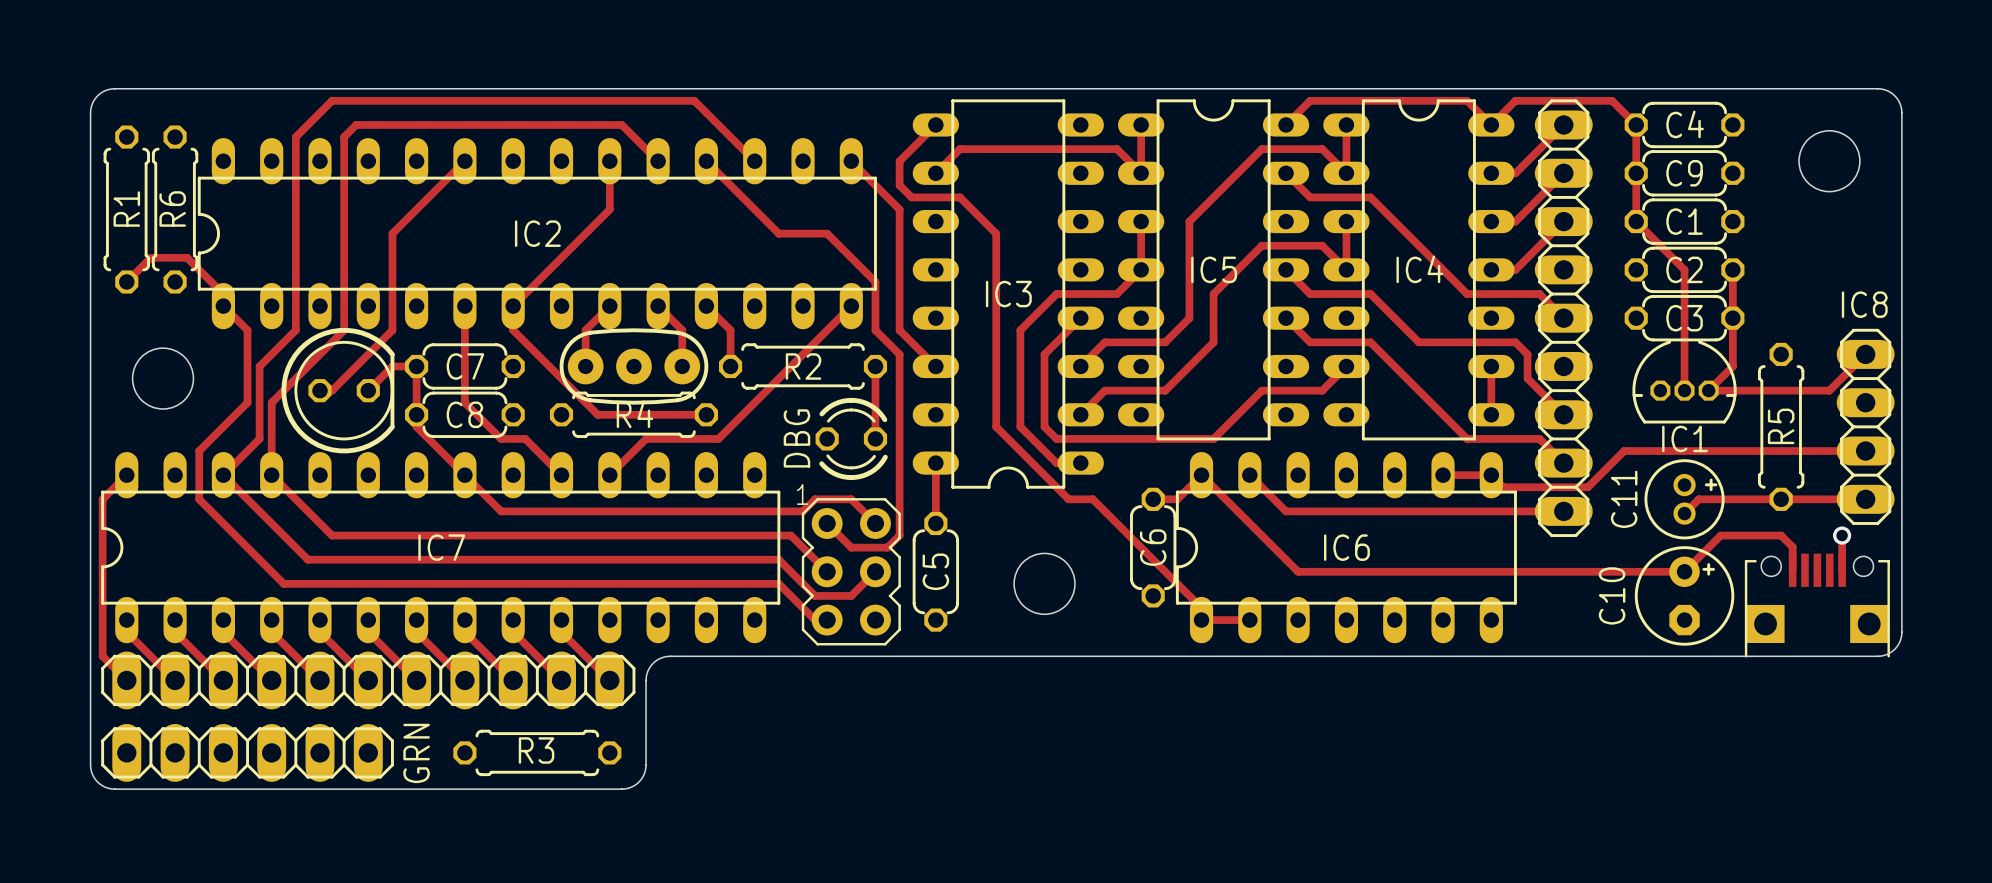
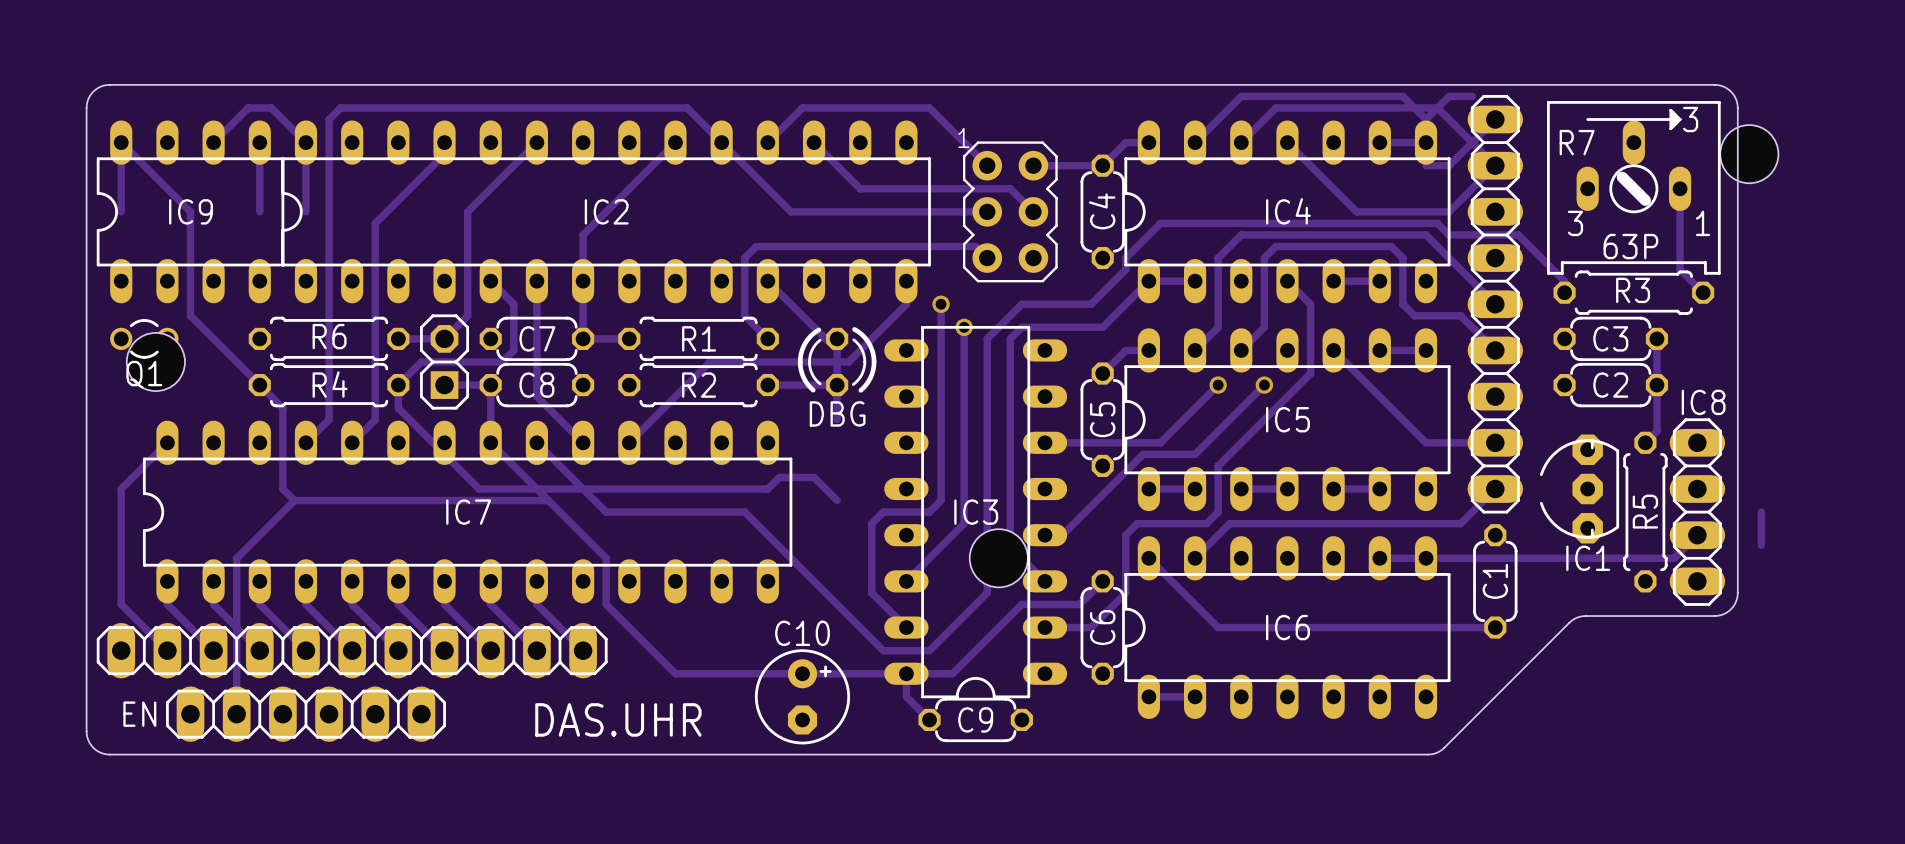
board edge: (1793, 88) (1880, 88) (1894, 95) (1901, 109) (1901, 632) (1898, 644) (1889, 653) (1877, 656) (667, 656) (653, 663) (646, 677) (646, 764) (644, 774) (633, 785) (621, 789) -> (1714, 84) (1723, 86) (1731, 91) (1736, 99) (1737, 107) (1737, 592) (1734, 604) (1726, 612) (1714, 616) (1585, 616) (1576, 617) (1569, 622) (1444, 747) (1431, 754) (594, 754)
track: (1310, 100) (1286, 124) -> (1252, 96) (1241, 96) (1195, 142)
track: (1539, 100) (1612, 100) (1636, 124) (1636, 221) (1684, 269) (1684, 390) -> none
track: (935, 124) (899, 161) (899, 185) (911, 197) -> (814, 142) (860, 188) (871, 188)
track: (1141, 124) (1141, 173) (1116, 149) (960, 149) (935, 173) -> none
track: (1346, 124) (1346, 173) (1322, 149) (1261, 149) (1189, 221) (1189, 318) (1165, 342) (1153, 342) -> (1195, 281) (1148, 281) (1102, 327)
C4 rotation: 0° (1684, 124) -> 90° clockwise (1102, 211)
C4 position: (1684, 124) -> (1102, 211)
track: (344, 137) (356, 124) (621, 124) (658, 161) -> (329, 131) (329, 119) (340, 107) (687, 107) (790, 211) (987, 211)
track: none -> (213, 142) (248, 107) (271, 107) (305, 142) (305, 211)
track: none -> (259, 142) (259, 211)
track: none -> (536, 142) (467, 211) (467, 315) (444, 338) (398, 338)
track: none -> (675, 142) (583, 234) (583, 338) (629, 338)
track: none -> (767, 142) (802, 107) (929, 107) (987, 165)
track: none -> (1148, 142) (1125, 142) (1102, 165) (1033, 165)
track: none -> (1241, 142) (1275, 107) (1437, 107) (1495, 165)
track: none -> (1287, 142) (1356, 211) (1426, 211)
track: none -> (1379, 142) (1426, 142)
track: (609, 161) (609, 209) (513, 306) (513, 330) (597, 414) (706, 414) -> none
track: (706, 161) (778, 233) (827, 233) (875, 281) (875, 330) (899, 354) (899, 535) (887, 547) (851, 547) (827, 523) -> none
track: (754, 161) (694, 100) (332, 100) (295, 137) (295, 330) (259, 366) (259, 438) (223, 475) (307, 559) (778, 559) (815, 595) (851, 595) (875, 571) -> none
track: (851, 161) (899, 209) (899, 330) (935, 366) -> none
track: (1286, 173) (1310, 197) (1370, 197) (1467, 294) (1539, 294) -> (1264, 234) (1426, 234) (1472, 281)
C9 position: (1684, 173) -> (975, 719)
R7: none -> (1633, 187)
track: (960, 197) (996, 233) (996, 426) (1068, 499) (1092, 499) (1201, 608) (1201, 620) (1249, 620) -> (917, 188) (1010, 188) (1033, 211)
track: none -> (1680, 188) (1680, 269) (1703, 292)
R1 rotation: 0° (126, 209) -> 90° clockwise (698, 338)
R1 position: (126, 209) -> (698, 338)
R6 rotation: 0° (175, 209) -> 90° clockwise (329, 338)
R6 position: (175, 209) -> (329, 338)
track: none -> (121, 211) (121, 142) (190, 211) (190, 315) (282, 408) (282, 489) (294, 500)
IC9: none -> (190, 211)
track: (1141, 221) (1141, 269) (1116, 294) (1056, 294) (1020, 330) (1020, 426) (1056, 463) (1080, 463) -> none
track: (1346, 221) (1346, 269) (1322, 245) -> none
track: (1563, 221) (1515, 269) (1491, 269) -> none
C1 rotation: 0° (1684, 221) -> 90° clockwise (1495, 581)
C1 position: (1684, 221) -> (1495, 581)
IC2 position: (537, 233) -> (606, 211)
track: (1298, 245) (1261, 245) (1213, 294) (1213, 342) (1165, 390) (1104, 390) (1080, 414) -> (1241, 234) (1218, 258) (1218, 327) (1195, 350)
track: none -> (987, 258) (975, 246) (756, 246) (744, 258) (744, 315) (767, 338)
IC5 rotation: 0° (1213, 269) -> 90° counterclockwise (1287, 419)
IC5 position: (1213, 269) -> (1287, 419)
track: (1286, 269) (1310, 294) (1370, 294) (1418, 342) (1515, 342) (1527, 354) (1527, 378) (1563, 414) -> none
IC4 rotation: 0° (1418, 269) -> 90° counterclockwise (1287, 211)
C2 position: (1684, 269) -> (1610, 385)
track: (1732, 269) (1732, 354) -> none
track: (126, 281) (150, 257) (187, 257) (223, 294) (223, 306) (247, 330) (247, 402) (199, 451) (199, 499) (283, 583) (778, 583) (815, 620) (827, 620) -> none
track: none -> (536, 281) (536, 396) (583, 442)
track: none -> (767, 281) (825, 338) (837, 338)
track: none -> (906, 281) (906, 304) (848, 361) (710, 361) (629, 442)
IC3 position: (1008, 294) -> (975, 512)
track: none -> (1287, 281) (1310, 304) (1310, 373) (1218, 465) (1218, 512) (1206, 523) (1137, 523) (1125, 535) (1125, 592) (1091, 627) (1044, 627)
track: none -> (1333, 281) (1379, 281)
IC8 name position: IC8 (1864, 304) -> IC8 (1703, 402)
track: (464, 306) (464, 402) (501, 438) (525, 438) (561, 475) -> none
track: (609, 306) (585, 330) (585, 366) -> none
track: (658, 306) (682, 330) (682, 366) -> none
track: (706, 306) (730, 330) (730, 366) -> none
track: (851, 306) (718, 438) (646, 438) (609, 475) -> none
track: none -> (941, 304) (941, 500) (929, 512) (883, 512) (871, 523) (871, 592) (906, 627)
via: none -> (941, 304)
track: (1080, 318) (1044, 354) (1044, 426) (1056, 438) (1213, 438) (1261, 390) (1322, 390) (1346, 366) -> none
track: (1286, 318) (1310, 342) (1370, 342) (1394, 366) -> none
C3 position: (1684, 318) -> (1610, 338)
track: (344, 330) (271, 402) (271, 475) (332, 535) (633, 535) -> (536, 442) (606, 512)
track: none -> (329, 315) (329, 419) (305, 442)
track: (392, 330) (332, 390) (319, 390) -> (375, 315) (375, 419) (352, 442)
IC1 footprint: [1632, 340, 1737, 424] -> [1539, 434, 1620, 544]
track: none -> (964, 327) (964, 523) (906, 581)
via: none -> (964, 327)
track: (1104, 342) (1080, 366) -> (1056, 327) (1021, 327) (1010, 338) (1010, 546) (1044, 581)
Q1: none -> (144, 338)
track: (1865, 354) (1829, 390) (1708, 390) (1732, 366) -> (1645, 442) (1656, 431) (1656, 350)
C7 position: (464, 366) -> (536, 338)
part: (633, 366) -> none
R2 position: (803, 366) -> (698, 385)
track: none -> (1148, 350) (1125, 350) (1102, 373)
track: none -> (1241, 350) (1264, 327) (1264, 258) (1275, 246) (1391, 246) (1402, 258) (1402, 304) (1414, 315) (1460, 315) (1495, 350)
track: (1491, 366) (1491, 414) -> (1426, 350) (1379, 350)
part: none -> (444, 361)
part: (338, 390) -> none
track: (368, 390) (392, 366) (416, 366) (416, 402) -> (490, 281) (513, 304) (513, 350) (502, 361) (421, 361) (398, 385)
track: none -> (444, 385) (490, 385) (490, 442) (606, 558) (606, 604) (675, 673) (952, 673) (1021, 604) (1079, 604) (1102, 581)
track: none -> (767, 385) (837, 385)
track: none -> (1218, 385) (1160, 442) (1044, 442)
via: none -> (1218, 385)
track: none -> (1264, 385) (1195, 454) (1143, 454) (1062, 535) (1044, 535)
via: none -> (1264, 385)
C8 position: (464, 414) -> (536, 385)
R4 position: (633, 414) -> (329, 385)
R5 position: (1781, 426) -> (1645, 512)
IC8 position: (1865, 426) -> (1697, 512)
text rotation: 0° (796, 438) -> 90° clockwise (837, 413)
part rotation: 0° (851, 438) -> 90° counterclockwise (837, 361)
part position: (851, 438) -> (837, 361)
track: (1467, 438) (1539, 438) (1563, 463) -> (1402, 419) (1426, 442) (1495, 442)
track: (1865, 451) (1624, 451) (1587, 487) (1503, 487) (1491, 475) (1443, 475) -> none
track: none -> (167, 442) (121, 489) (121, 592)
track: (935, 463) (935, 523) -> none
track: (126, 475) (102, 499) (102, 656) (126, 680) -> none
track: (1249, 475) (1286, 511) (1298, 511) -> none
track: (1153, 499) (1177, 499) (1201, 475) (1298, 571) (1684, 571) (1720, 535) (1781, 535) (1792, 547) (1792, 570) -> none
C11: (1684, 499) -> none
track: (1865, 499) (1698, 499) (1684, 513) -> none
track: (1346, 511) (1394, 511) -> (1148, 489) (1195, 489)
track: (1443, 511) (1563, 511) -> (1195, 558) (1229, 523) (1460, 523) (1495, 489)
track: none -> (294, 500) (236, 558) (236, 714)
track: none -> (294, 500) (548, 500)
track: (778, 535) (790, 535) (827, 571) -> (744, 512) (883, 650) (929, 650) (987, 592) (987, 338) (1021, 304) (1091, 304) (1125, 269) (1125, 258) (1160, 223) (1437, 223) (1449, 234) (1518, 234) (1564, 281) (1564, 292)
via: (1842, 535) -> none
IC7 position: (440, 547) -> (467, 512)
C6 position: (1153, 547) -> (1102, 627)
IC6 position: (1346, 547) -> (1287, 627)
track: none -> (1697, 535) (1674, 558) (1379, 558)
part position: (851, 571) -> (1010, 211)
C5 position: (935, 571) -> (1102, 419)
track: none -> (1148, 558) (1218, 627) (1495, 627)
C10 name rotation: 0° (1612, 595) -> 90° clockwise (802, 633)
C10 name position: C10 (1612, 595) -> C10 (802, 633)
C10 position: (1684, 595) -> (802, 696)
part: (1817, 605) -> none
track: none -> (906, 673) (906, 696) (929, 719)
track: none -> (1148, 696) (1195, 696)
text: none -> EN (139, 714)
part position: (247, 752) -> (305, 714)
R3 position: (537, 752) -> (1633, 292)
text: none -> DAS.UHR (618, 719)
text: GRN (416, 753) -> none

